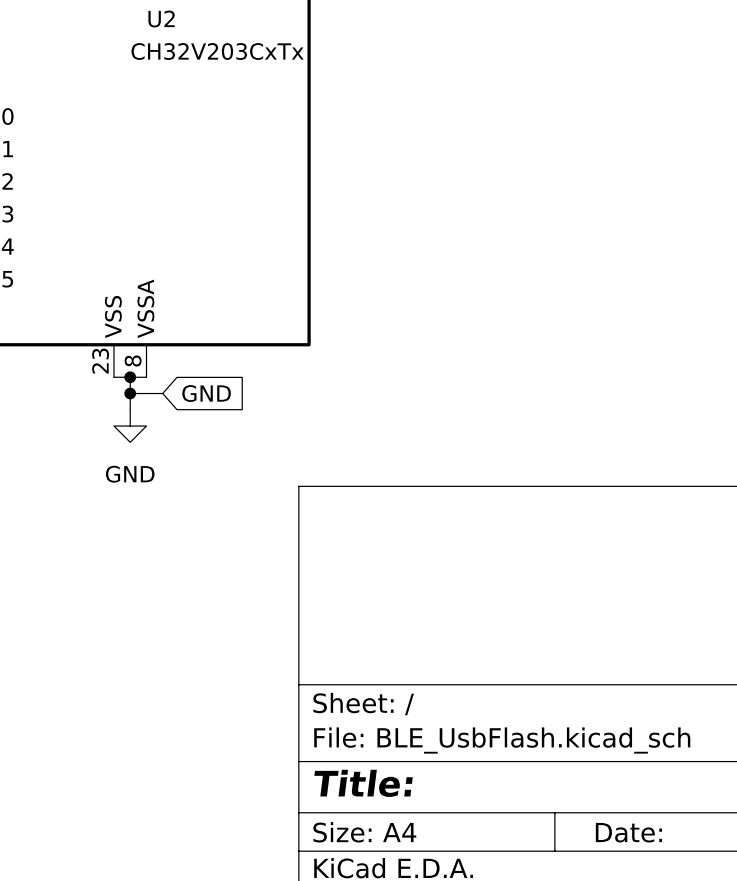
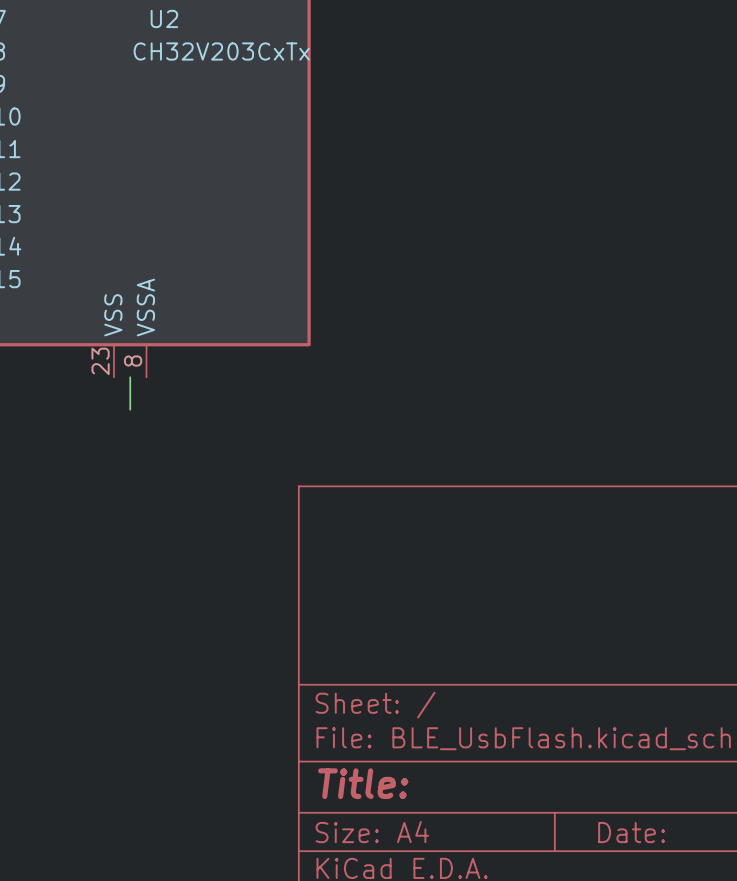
wire: (113, 377) (146, 377) -> none
junction: (130, 377) -> none
wire: (130, 393) (162, 393) -> none
junction: (130, 393) -> none
global label: GND (206, 393) -> none
power symbol: GND (130, 426) -> none

